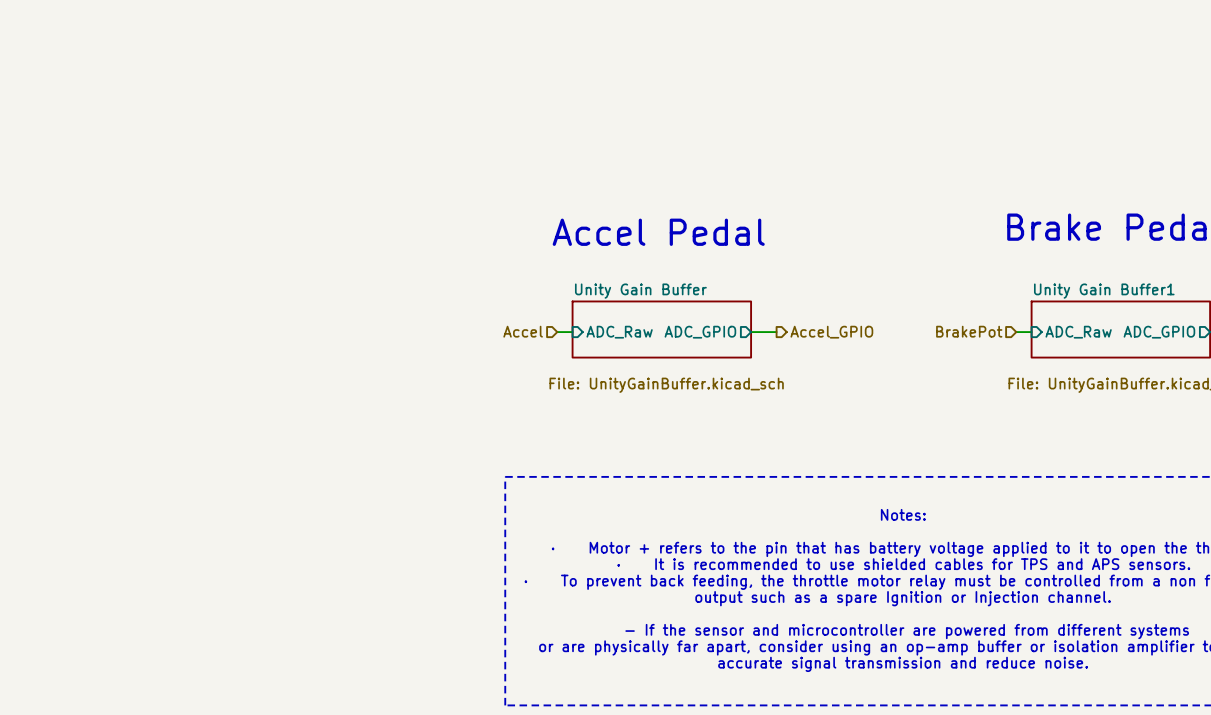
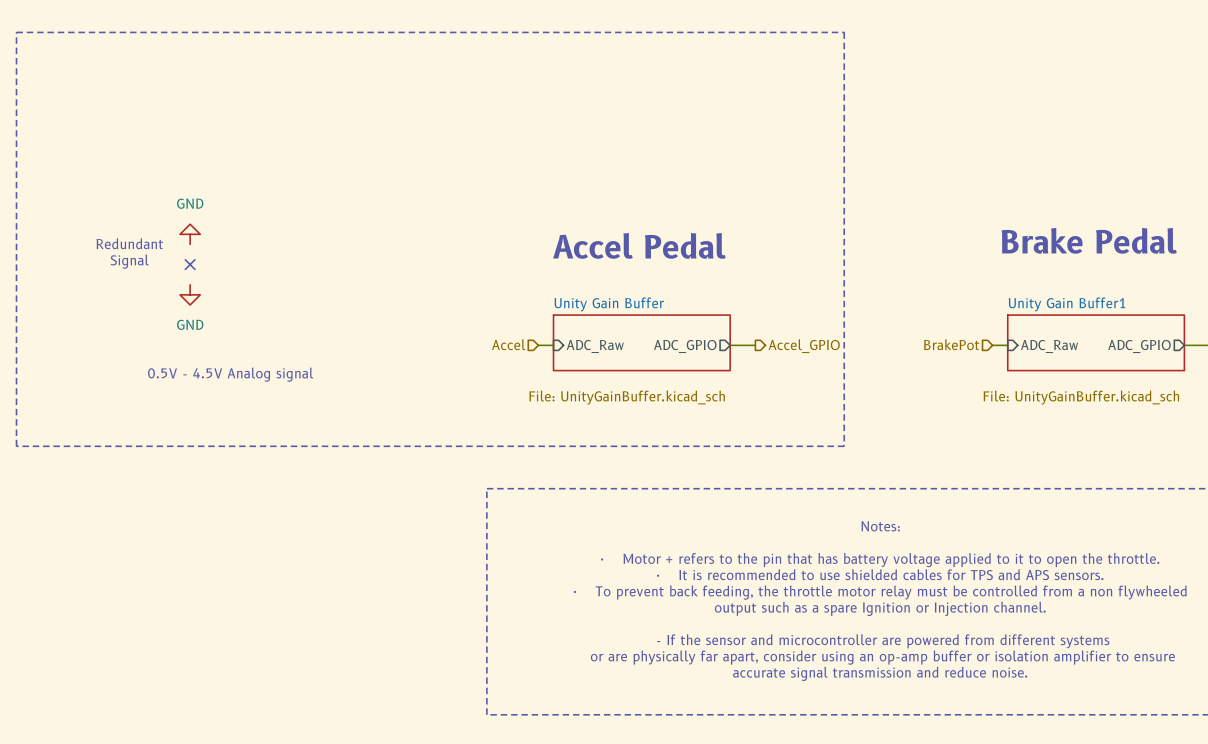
line: none -> (16, 32) (844, 32) (844, 446) (16, 446) (16, 32)
power symbol: none -> GND (190, 234)
text: none -> Redundant (129, 243)
text: none -> Signal (129, 261)
no-connect mark: none -> (190, 264)
power symbol: none -> GND (190, 294)
text: none -> 0.5V - 4.5V Analog signal (230, 374)

